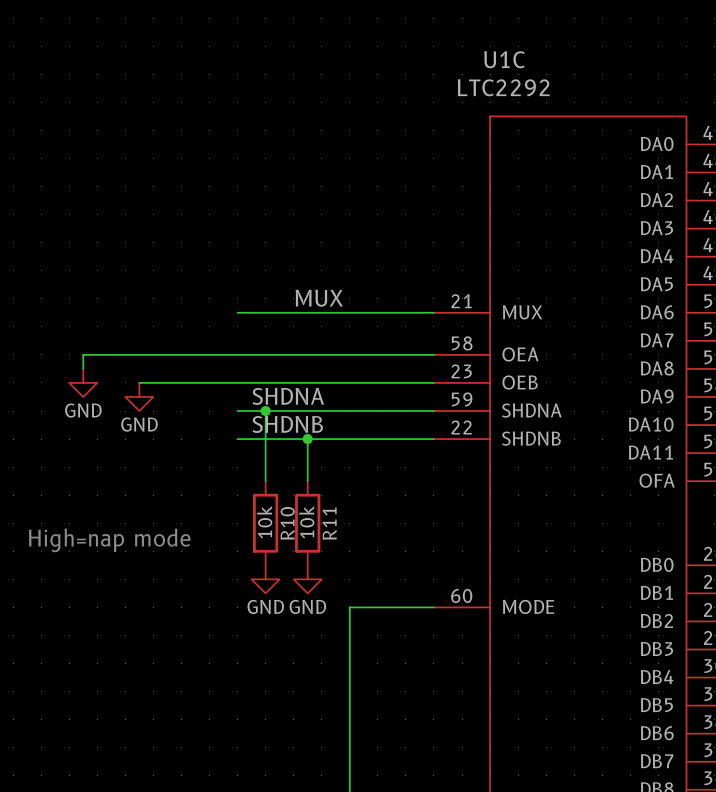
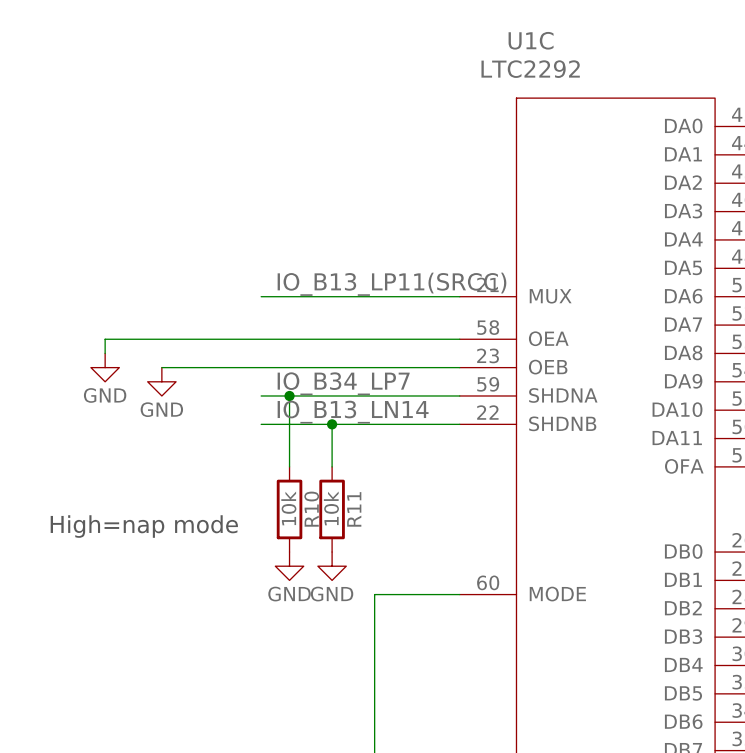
label: MUX (319, 298) -> none
label: none -> IO_B13_LP11(SRCC) (391, 284)
label: SHDNA (288, 396) -> IO_B34_LP7 (343, 383)
label: SHDNB (287, 424) -> IO_B13_LN14 (353, 412)

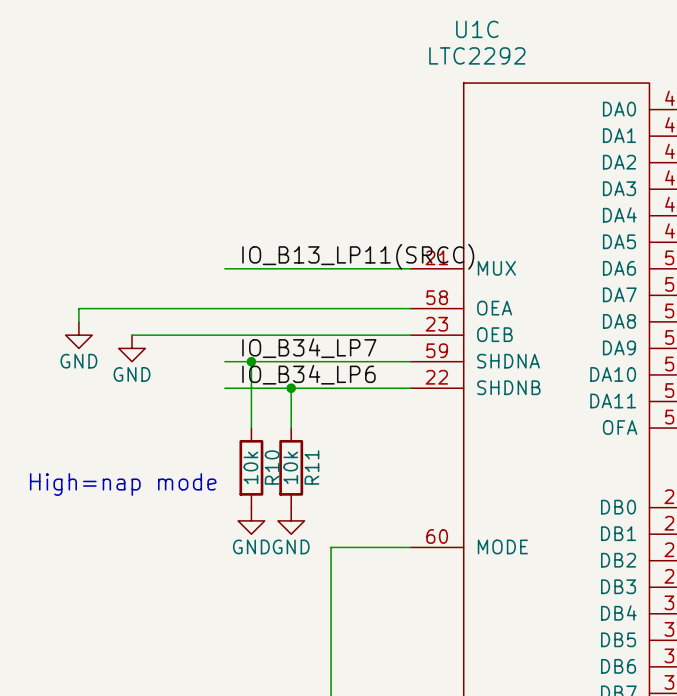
label: IO_B13_LN14 (353, 412) -> IO_B34_LP6 (308, 374)

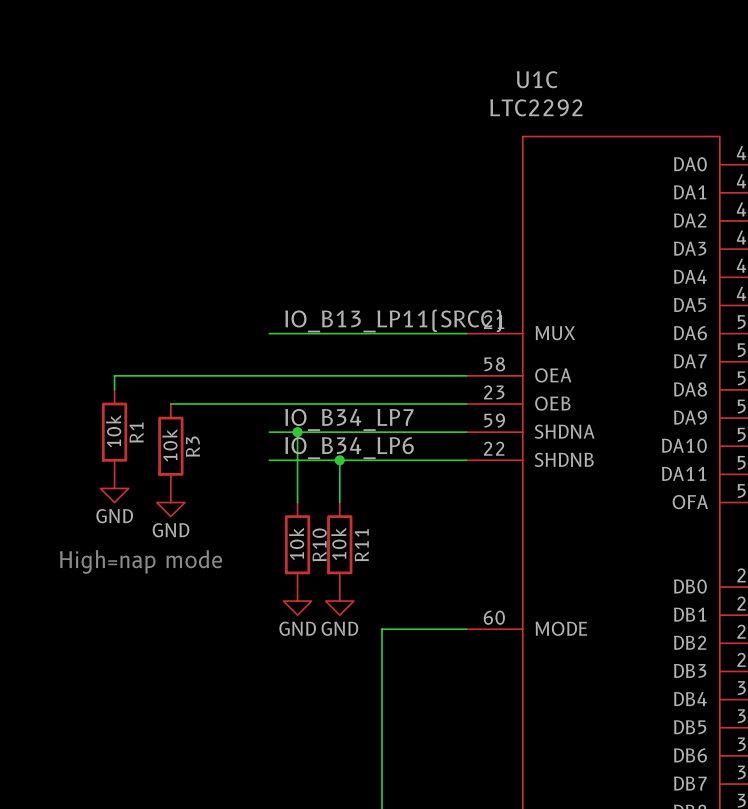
power symbol: GND (78, 335) -> none
power symbol: GND (132, 348) -> none
R1: none -> 10k (114, 432)
R3: none -> 10k (170, 446)
power symbol: none -> GND (114, 488)
power symbol: none -> GND (170, 502)

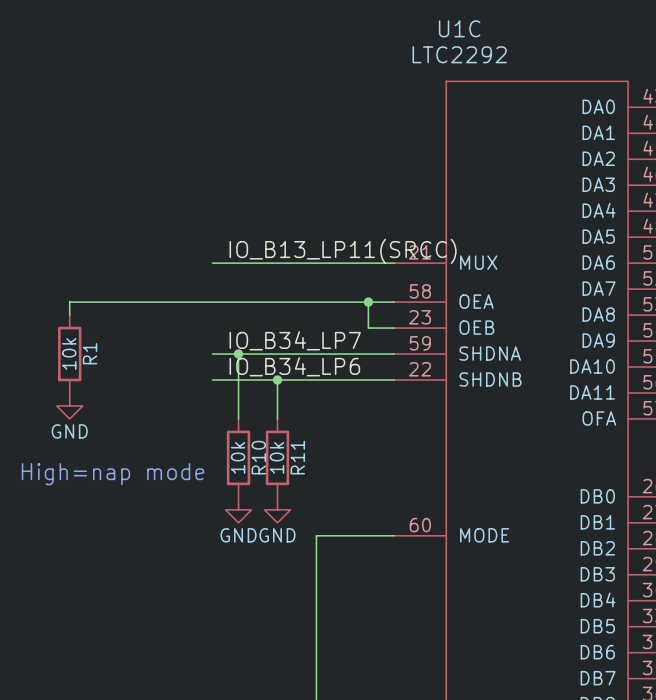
junction: none -> (368, 302)
wire: (170, 404) (438, 404) -> (368, 302) (368, 328)
R3: 10k (170, 446) -> none
power symbol: GND (170, 502) -> none

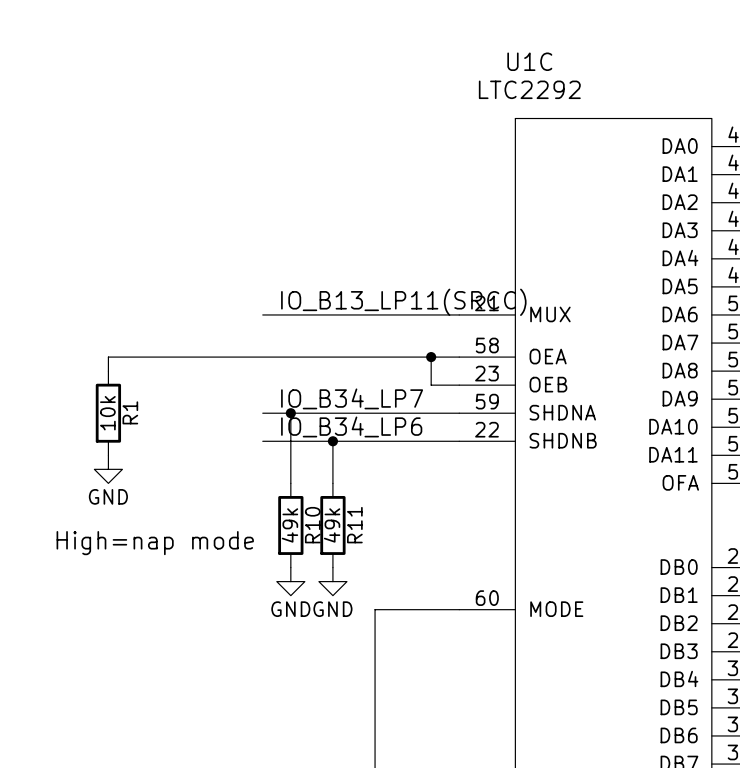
R10 value: 10k (238, 457) -> 49k (289, 525)
R11 value: 10k (277, 457) -> 49k (332, 525)

